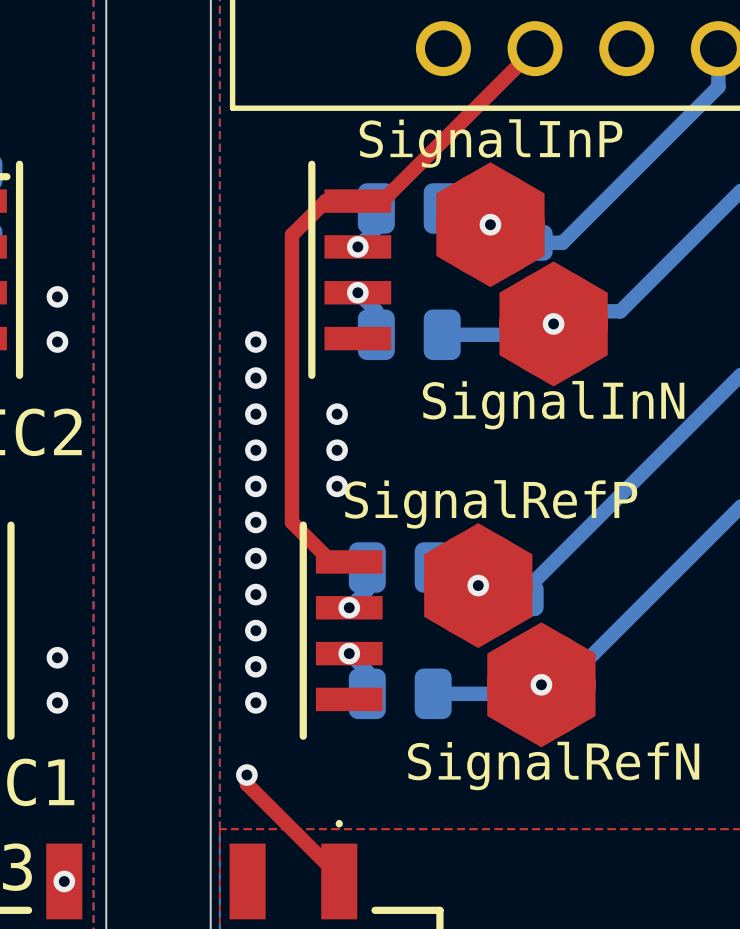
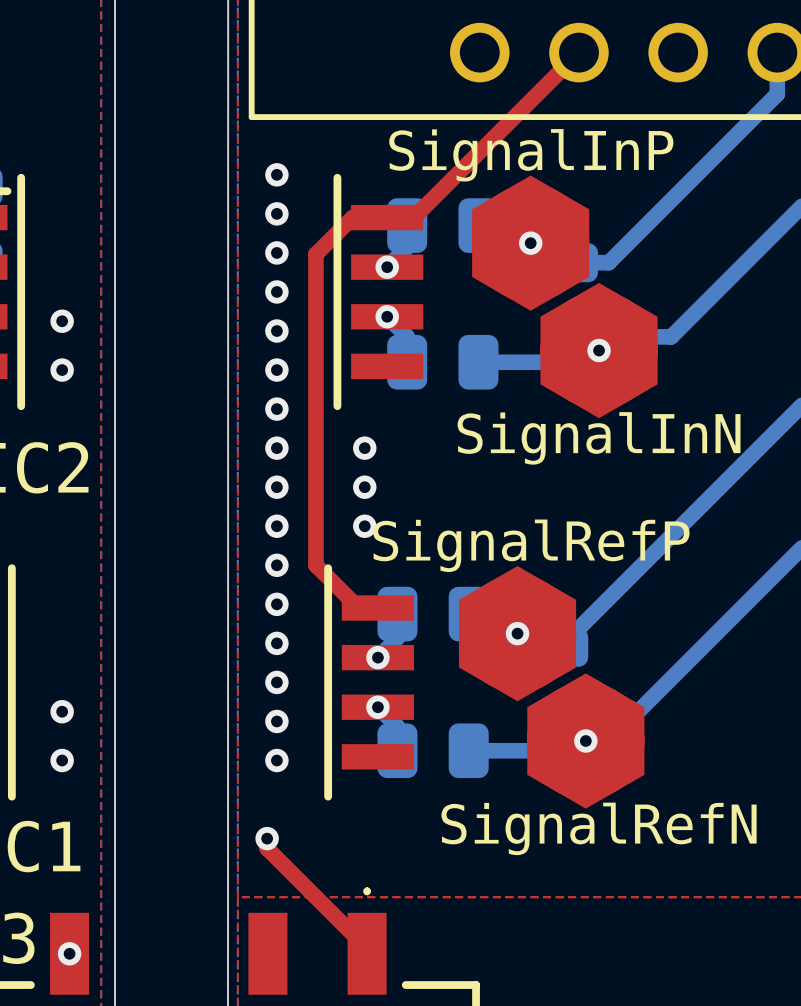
via: none -> (276, 174)
via: none -> (276, 213)
via: none -> (276, 252)
via: none -> (276, 291)
via: none -> (276, 331)

